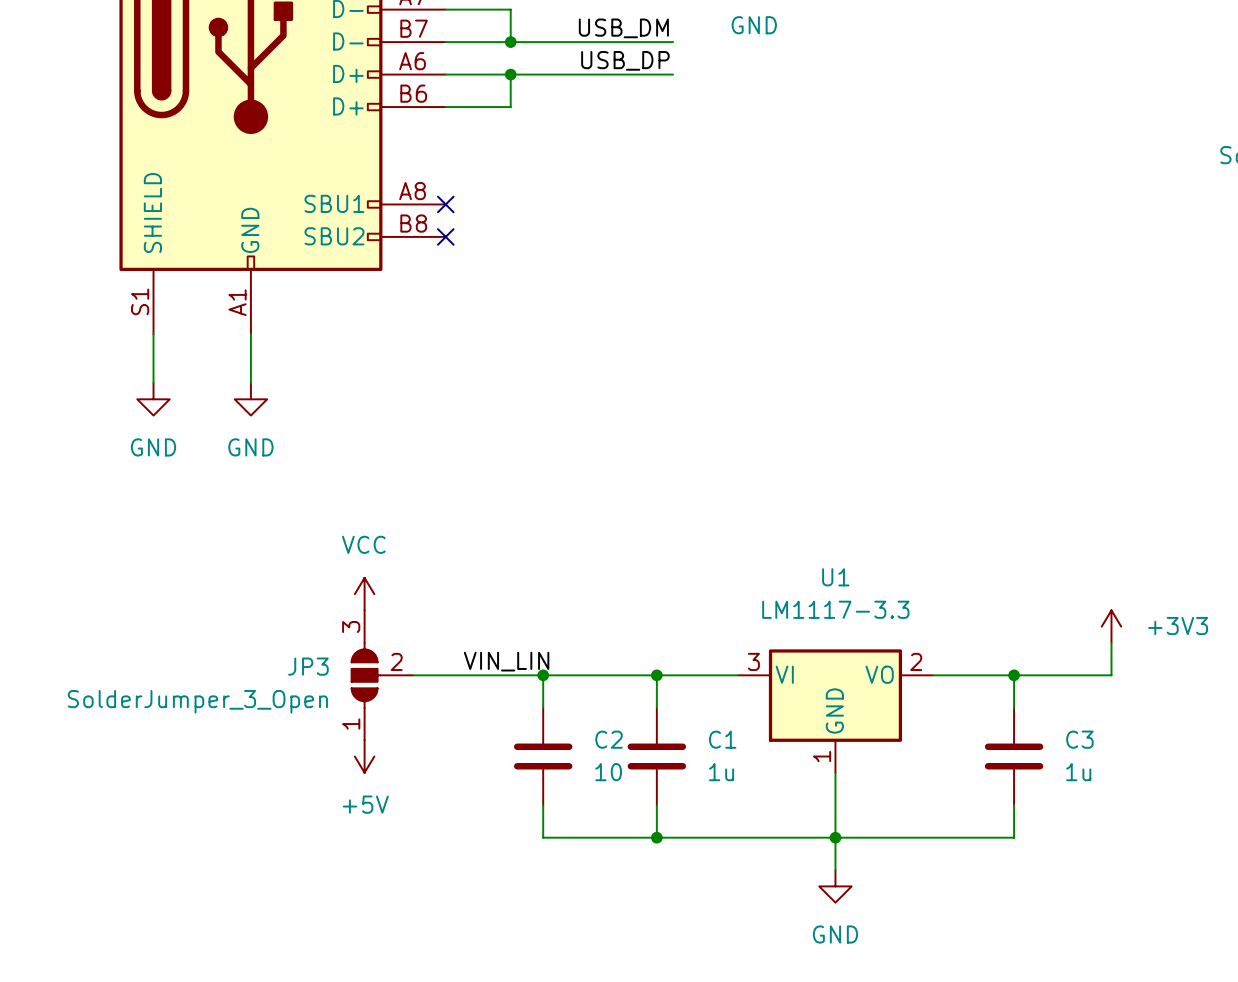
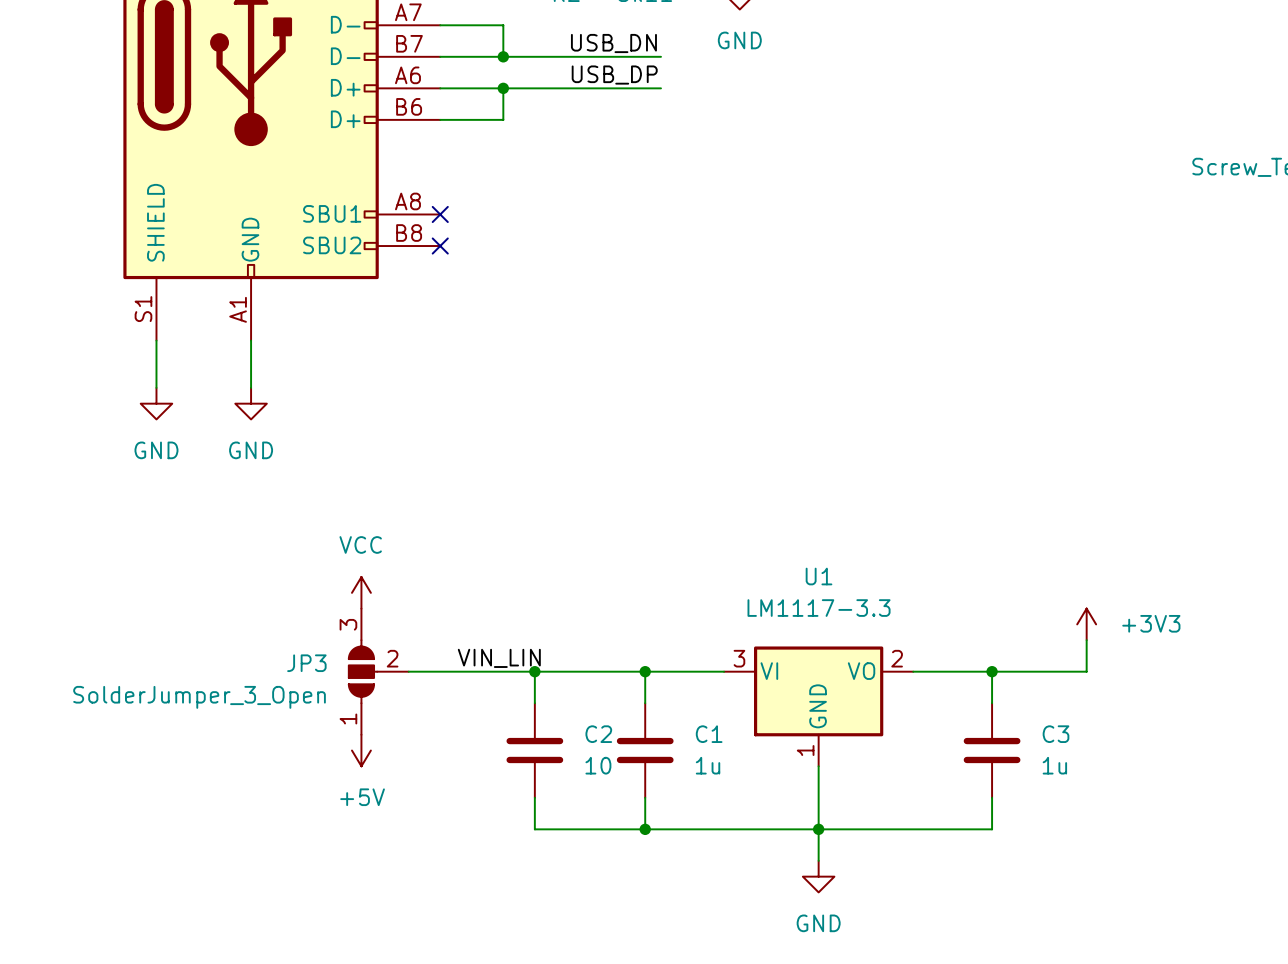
label: USB_DM (623, 28) -> USB_DN (613, 43)

